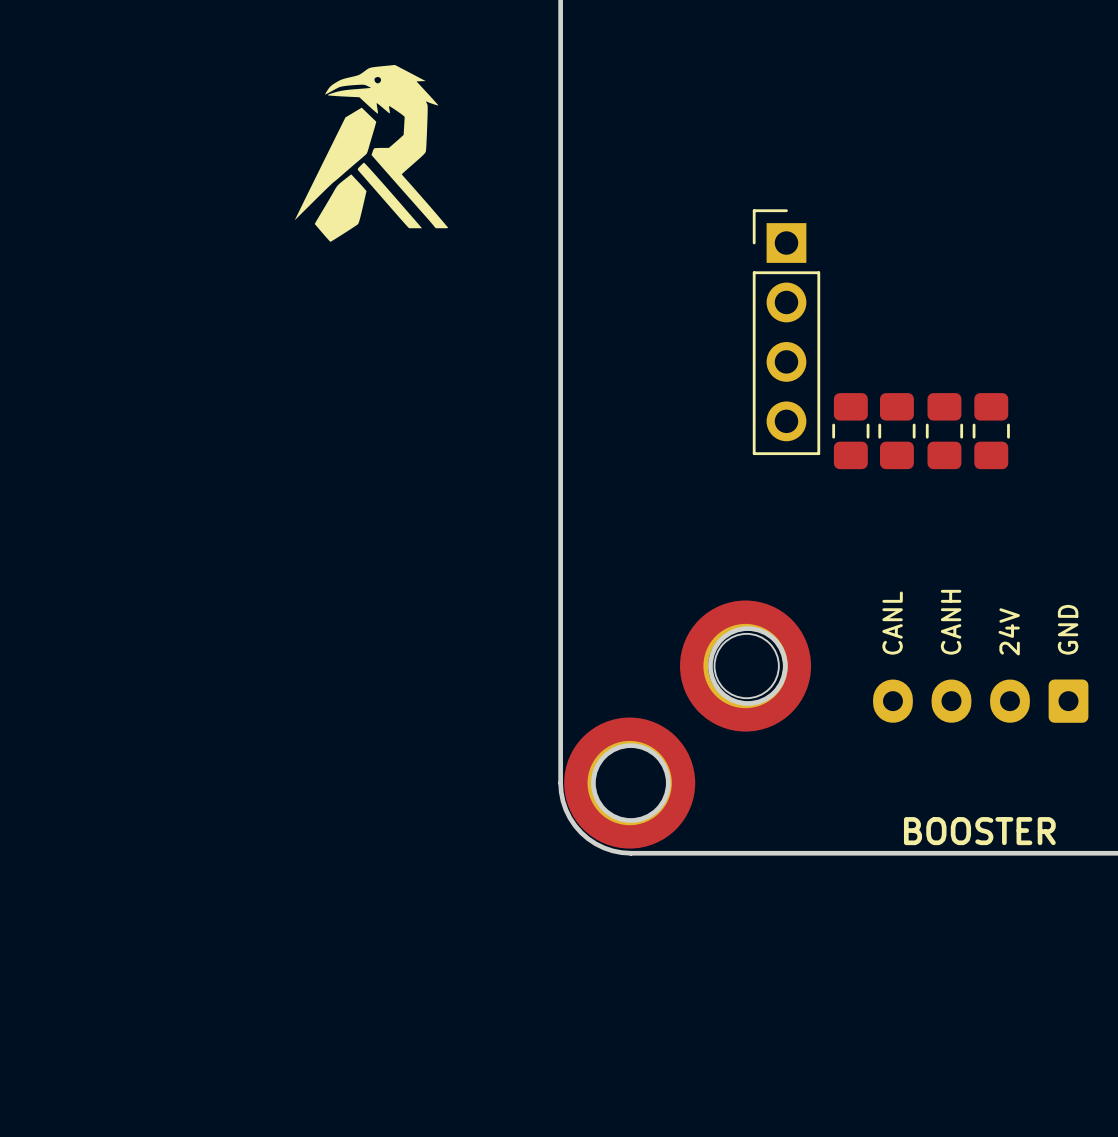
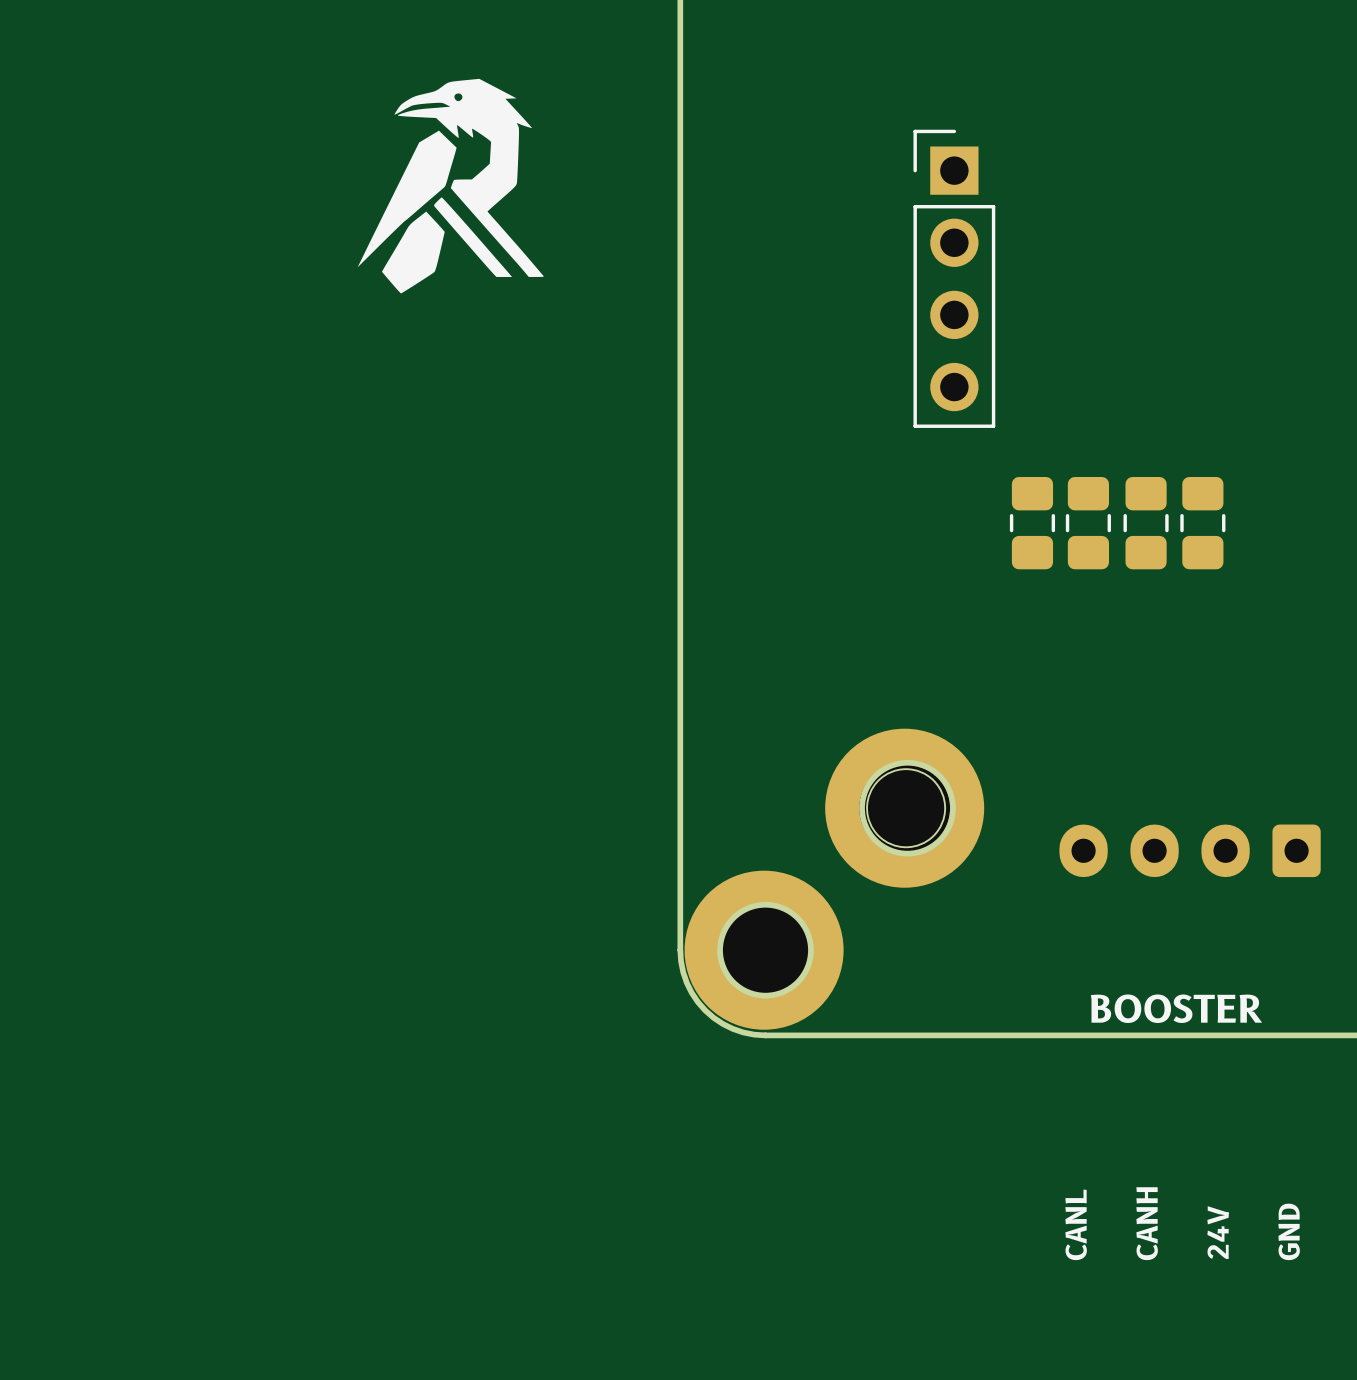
part position: (786, 332) -> (954, 278)
text position: CANH (951, 622) -> CANH (1147, 1223)
text position: CANL (892, 623) -> CANL (1076, 1224)
text position: GND (1068, 629) -> GND (1289, 1231)
text position: 24V (1009, 631) -> 24V (1218, 1232)

